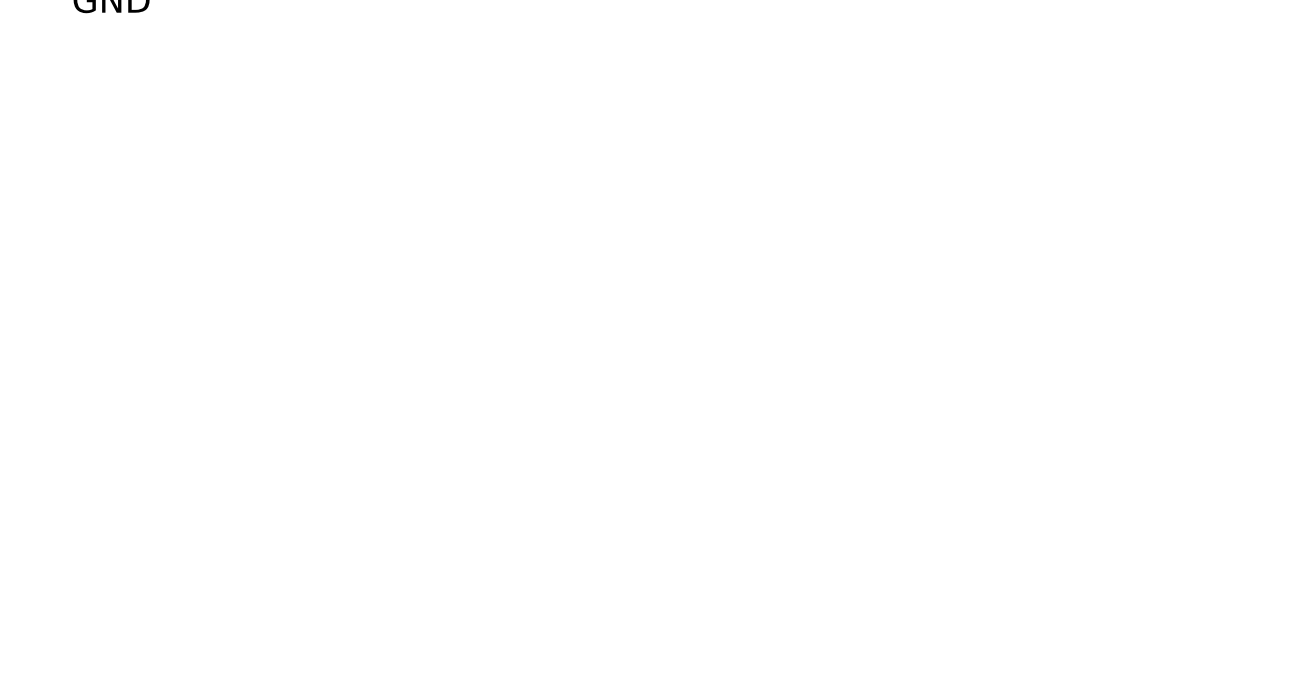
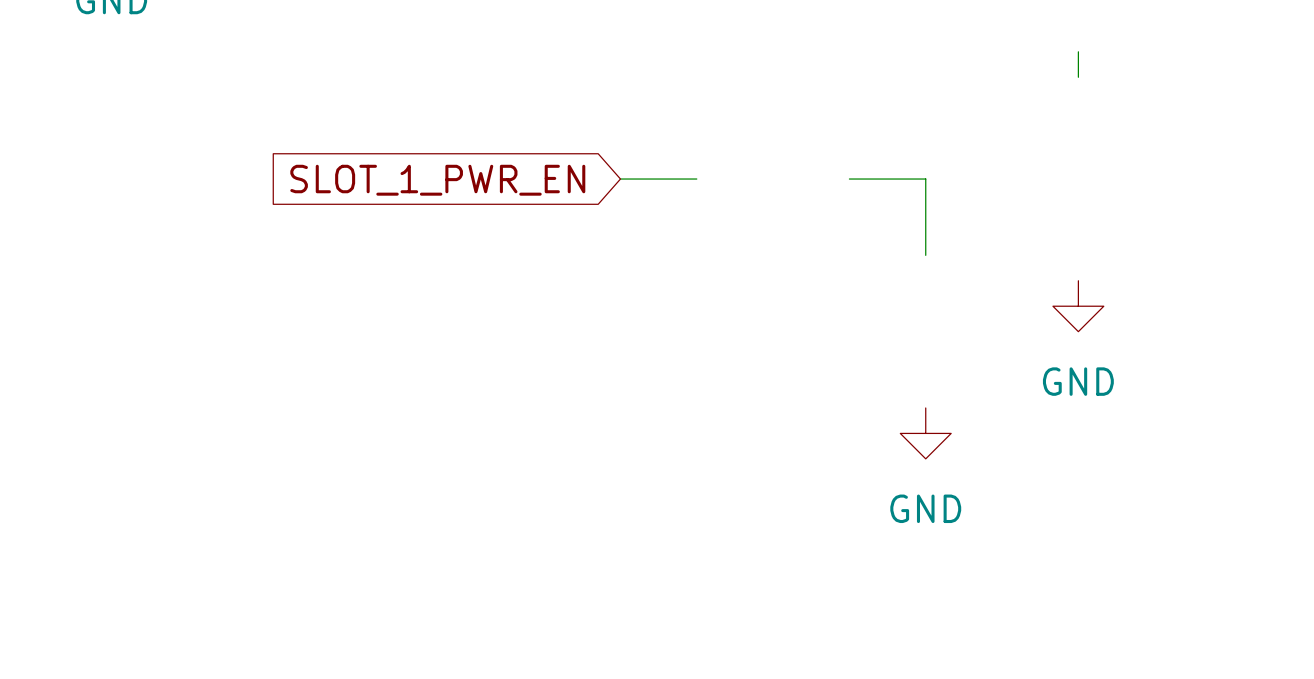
wire: none -> (1078, 51) (1078, 77)
wire: none -> (620, 179) (696, 179)
wire: none -> (849, 179) (925, 179) (925, 255)
global label: none -> SLOT_1_PWR_EN (437, 180)
power symbol: none -> GND (1078, 306)
power symbol: none -> GND (925, 433)

